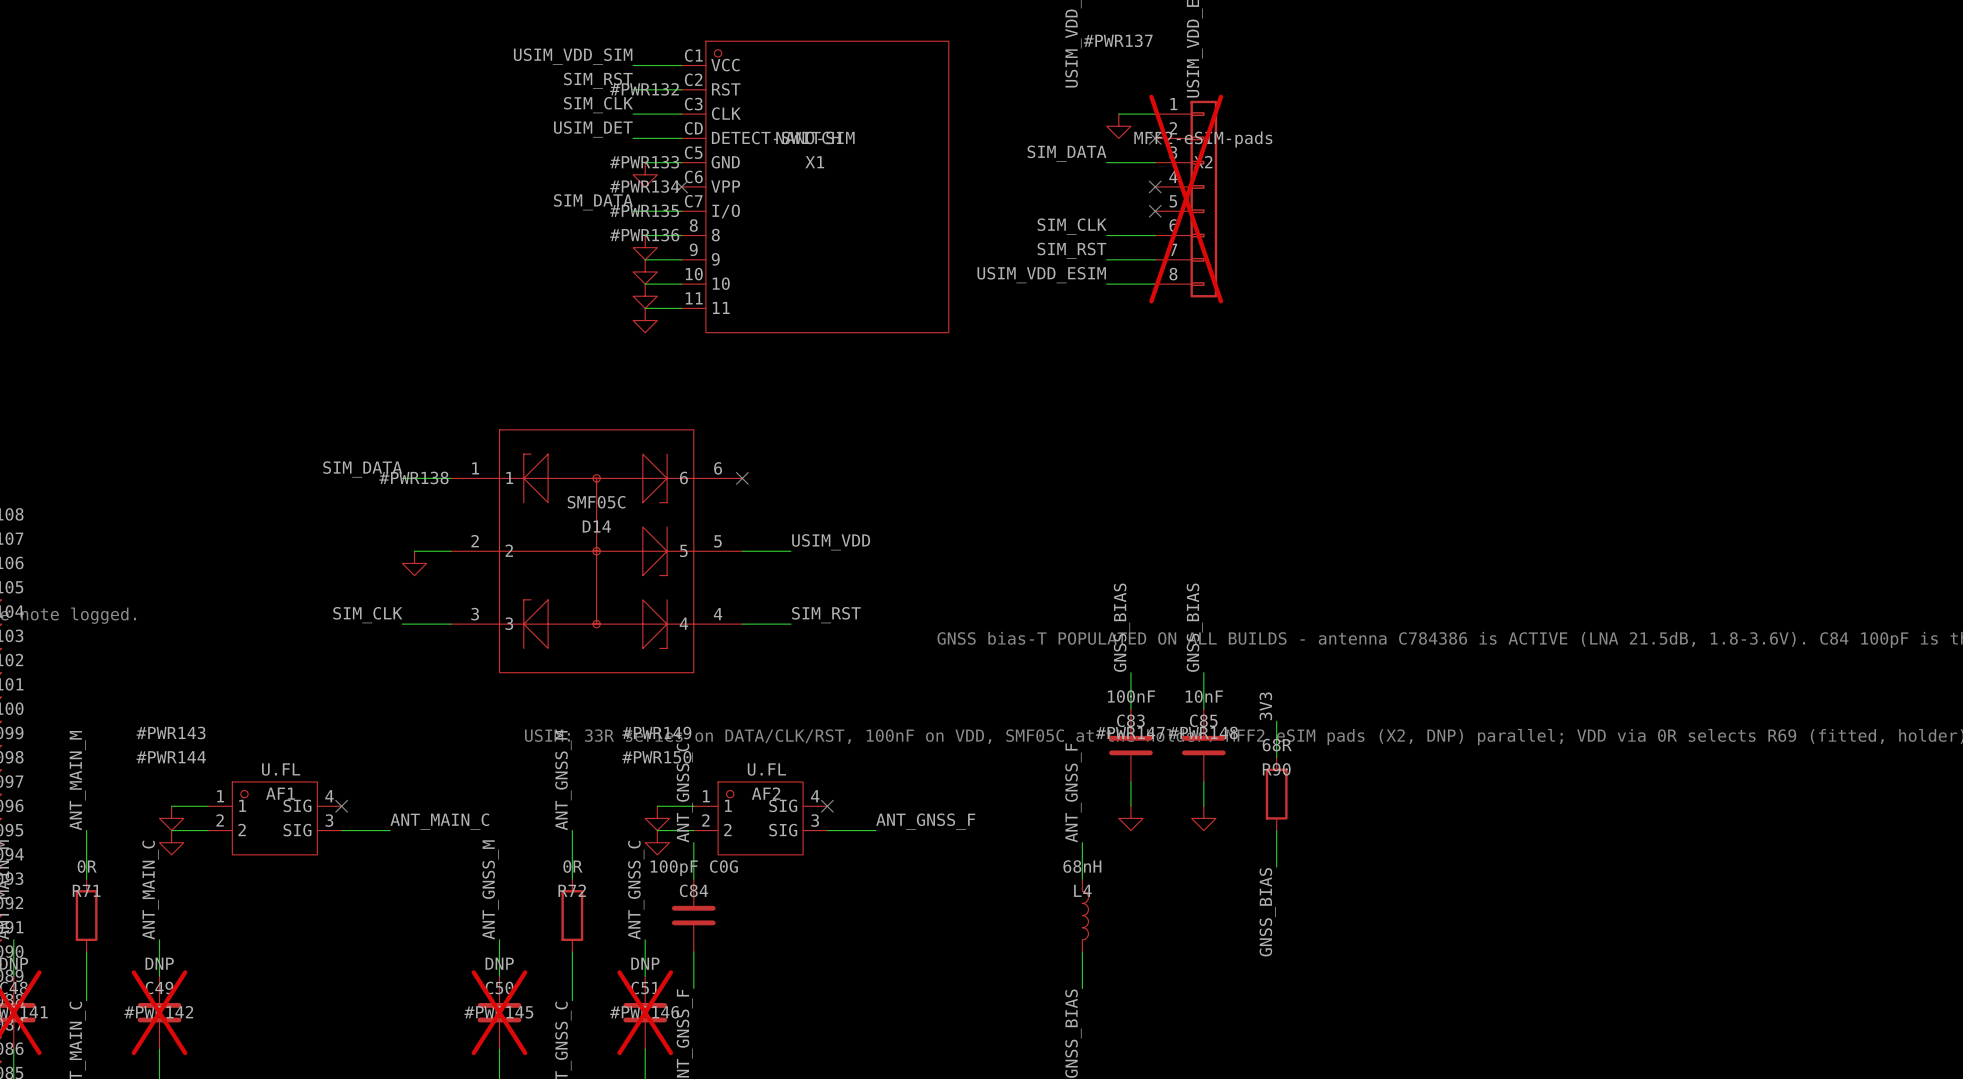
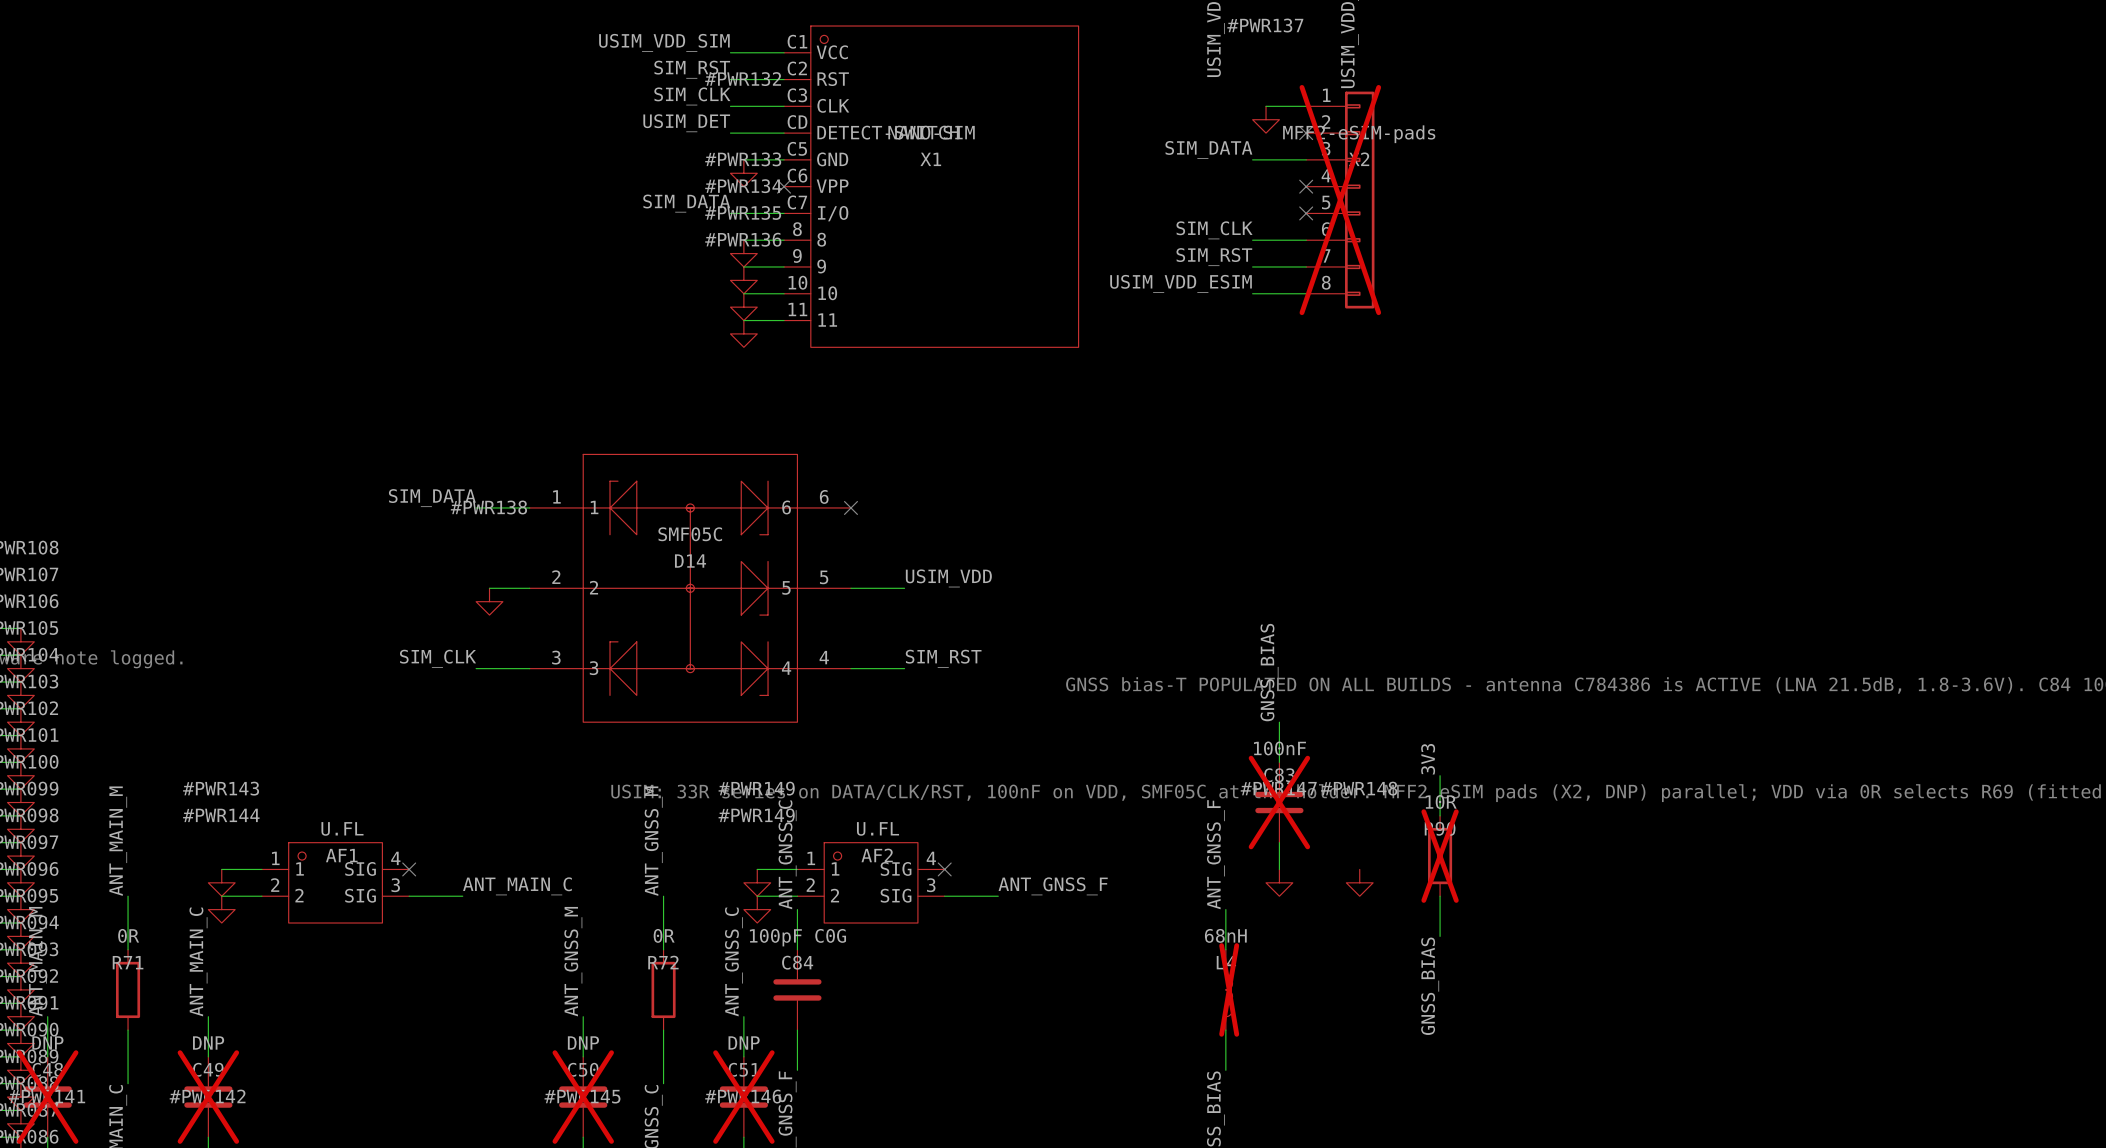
label: GNSS_BIAS (1194, 627) -> none
wire: (1203, 672) (1203, 709) -> none
C83 do-not-place cross: none -> (1279, 802)
C85: 10nF (1203, 745) -> none
R90 value: 68R (1277, 745) -> 10R (1441, 802)
#PWR150 name: #PWR150 (656, 757) -> #PWR149 (756, 815)
wire: (1203, 781) (1203, 806) -> none
R90 do-not-place cross: none -> (1440, 856)
L4 do-not-place cross: none -> (1229, 989)

